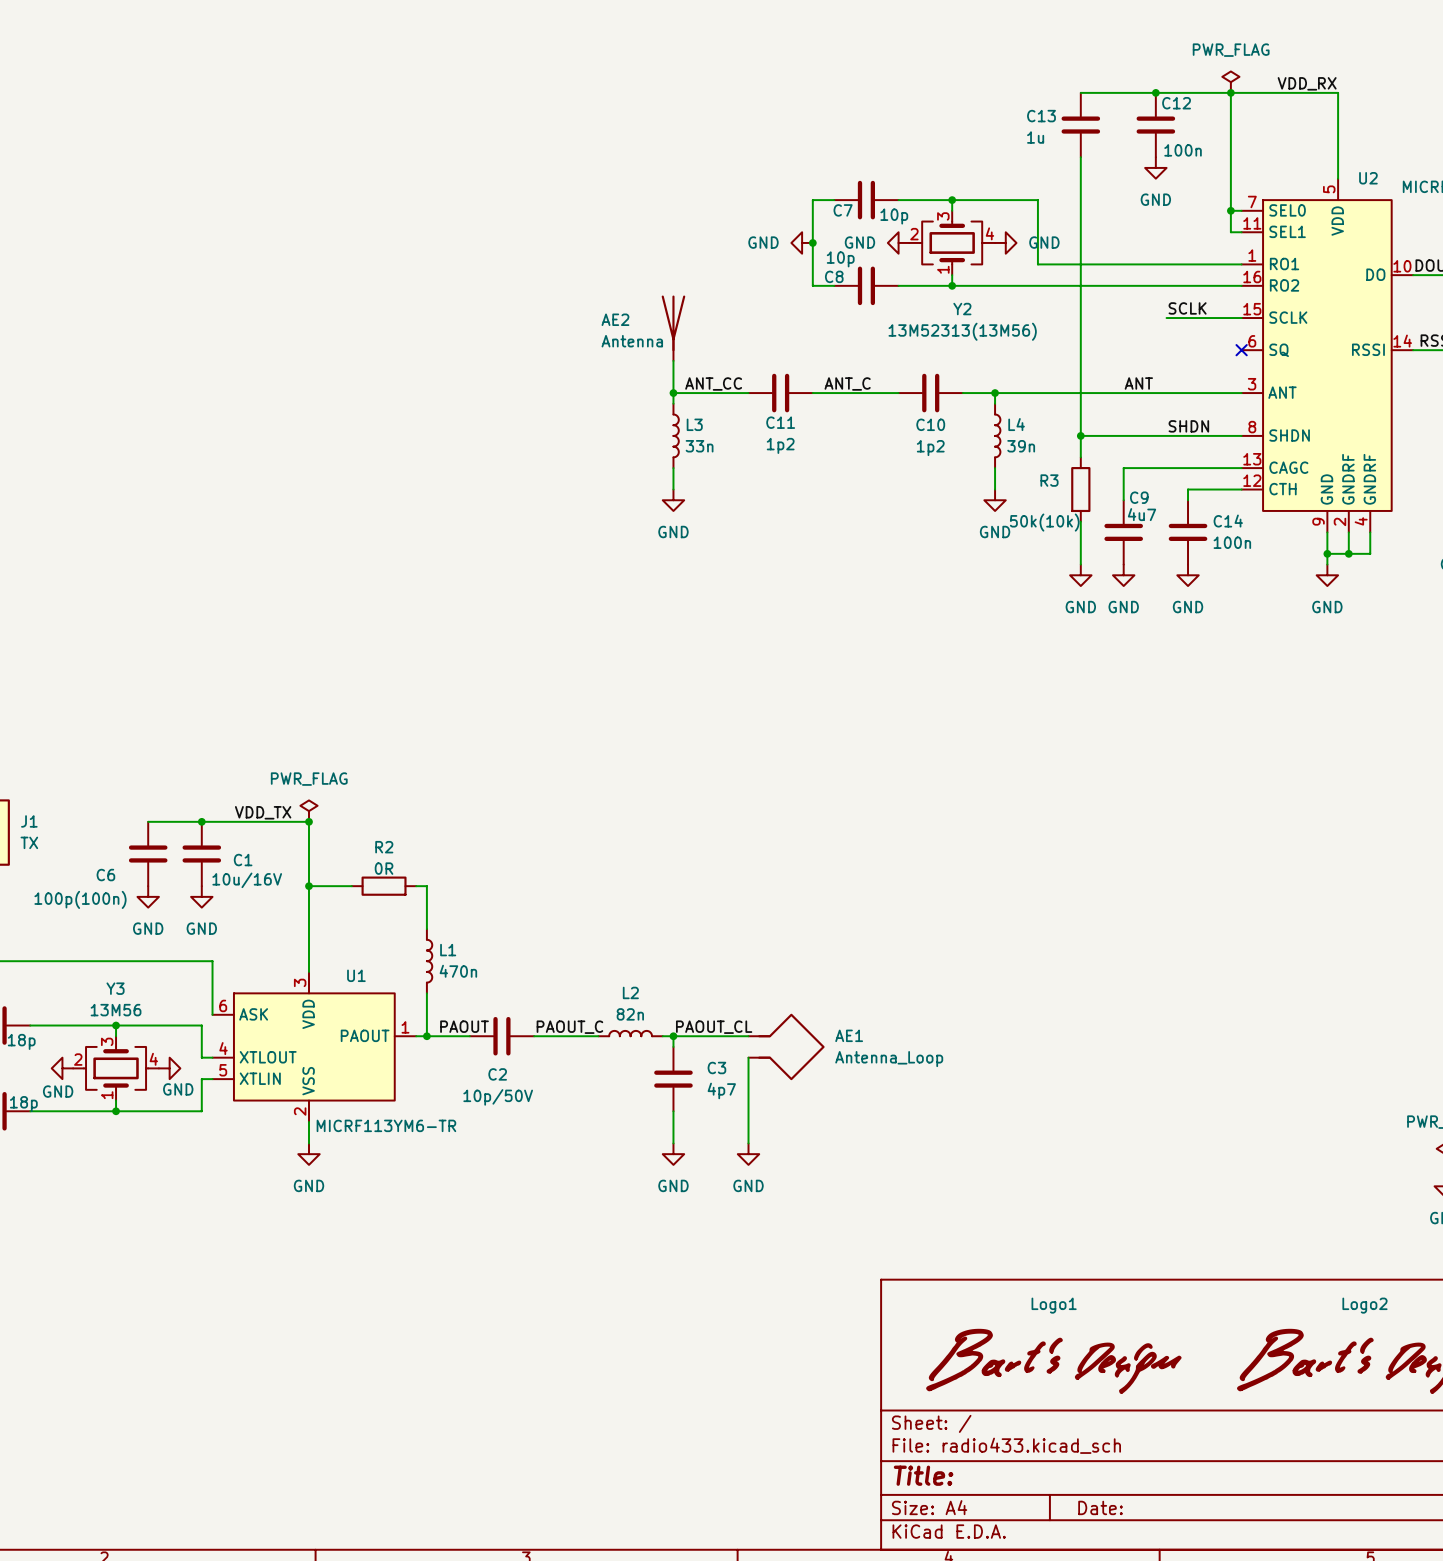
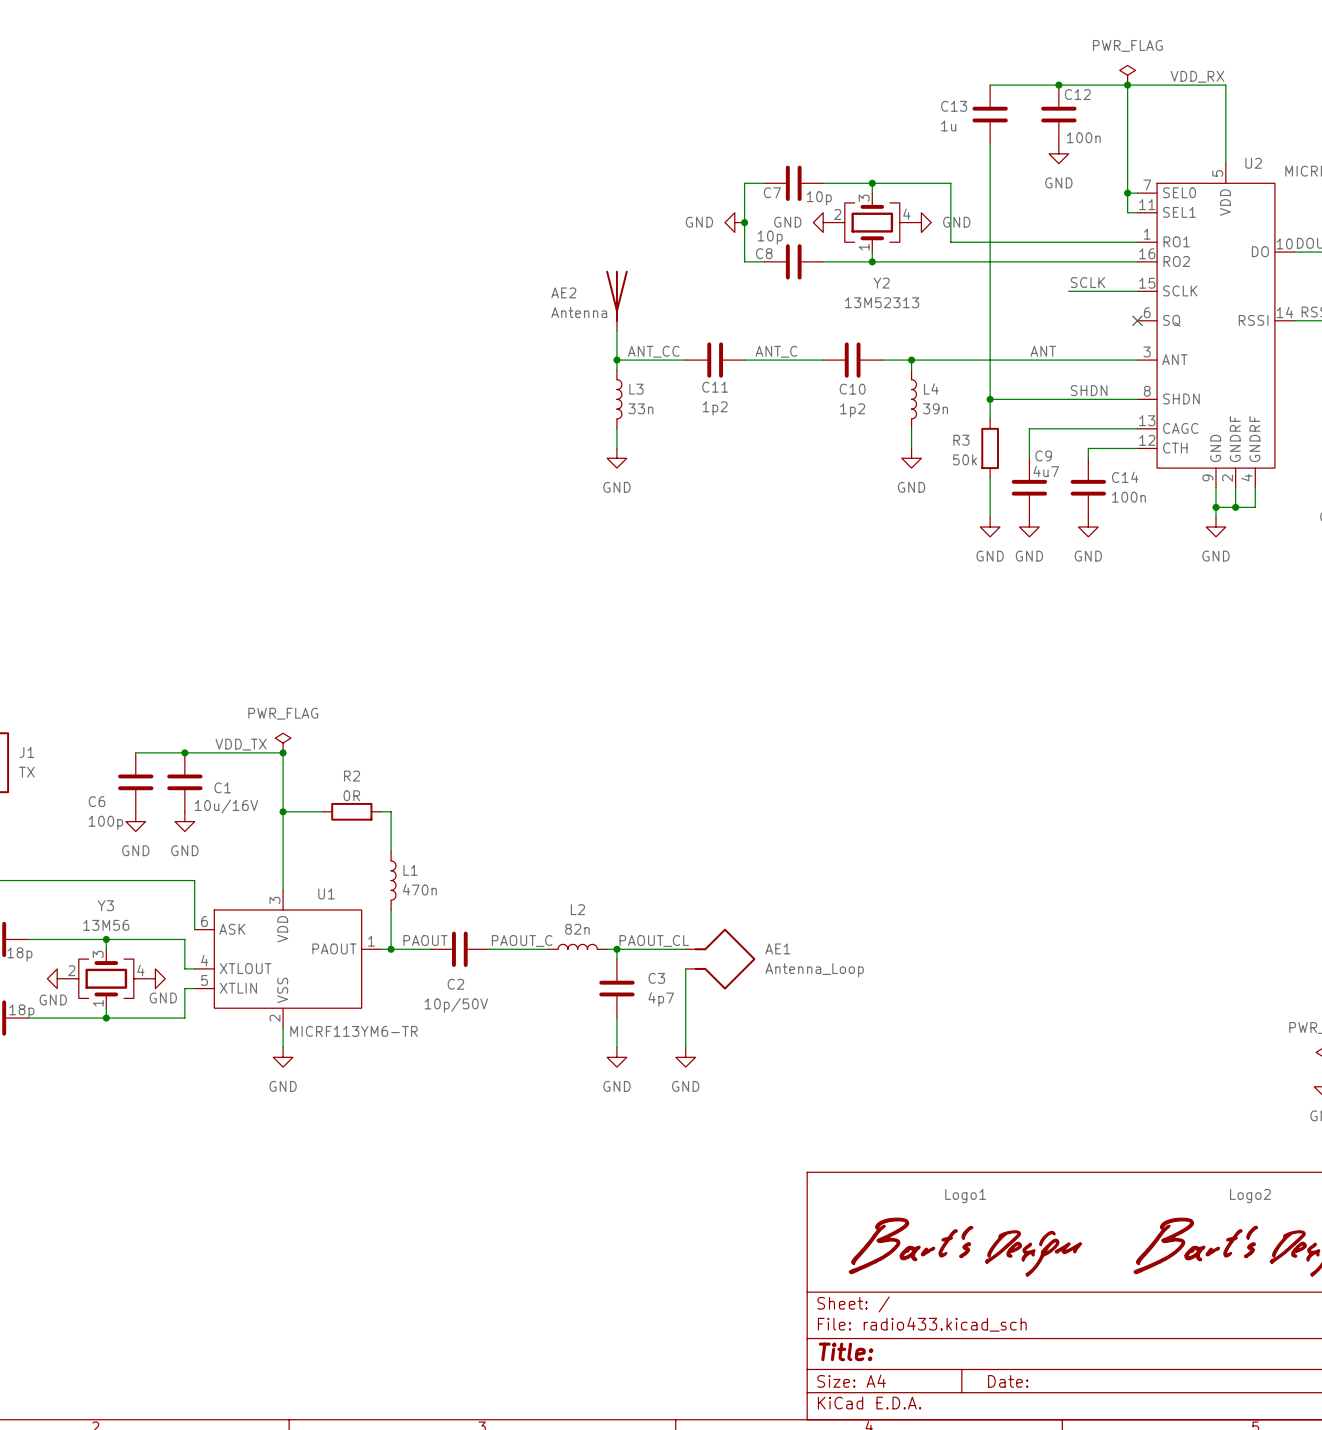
Y2 value: 13M52313(13M56) (962, 331) -> 13M52313 (882, 302)
R3 value: 50k(10k) (1044, 522) -> 50k (964, 459)
C6 value: 100p(100n) (80, 899) -> 100p (105, 822)

